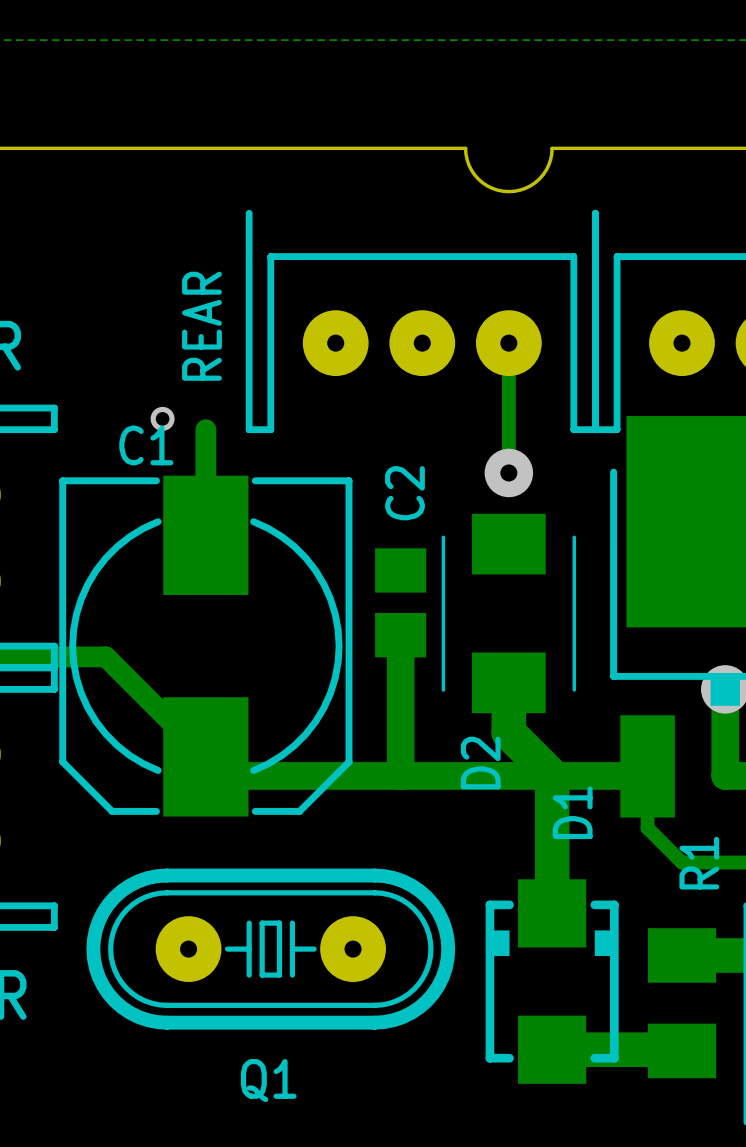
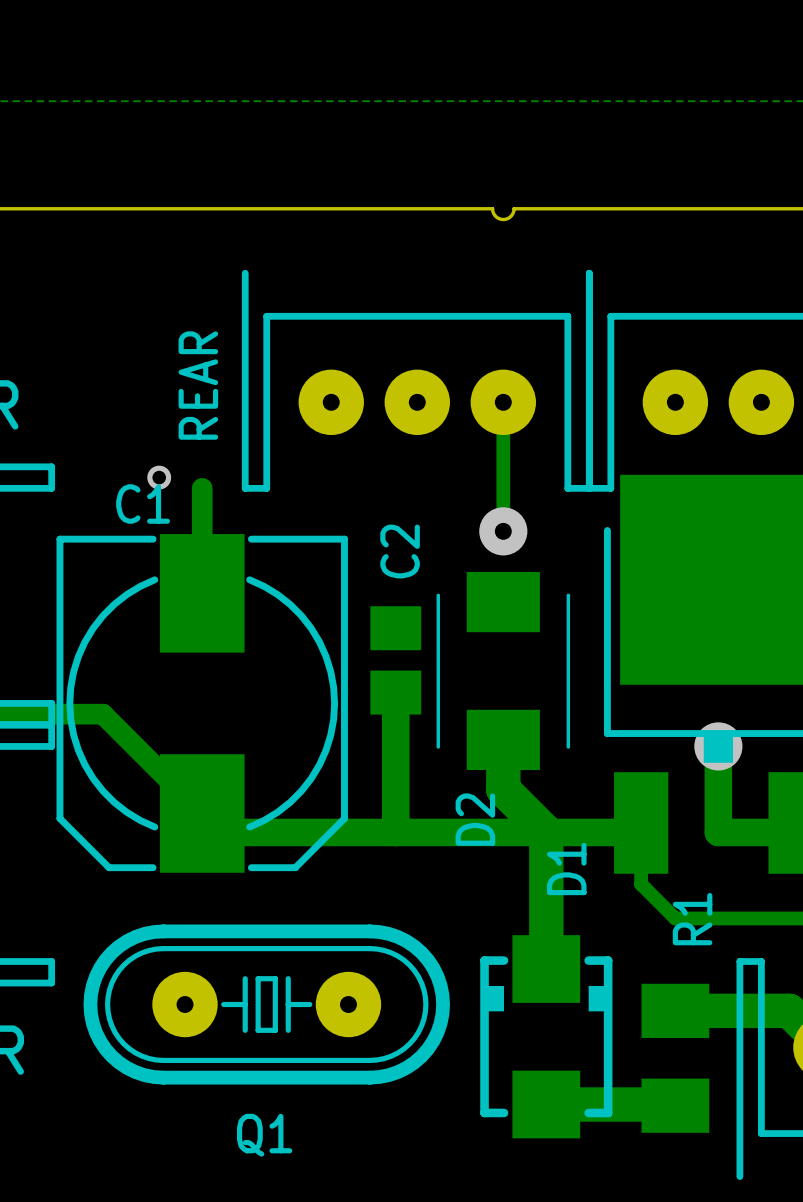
board edge: (552, 148) (548, 164) (539, 178) (525, 188) (508, 191) (492, 188) (478, 178) (468, 164) (465, 148) -> (546, 208) (514, 208) (510, 216) (503, 219) (495, 216) (492, 208) (460, 208)

